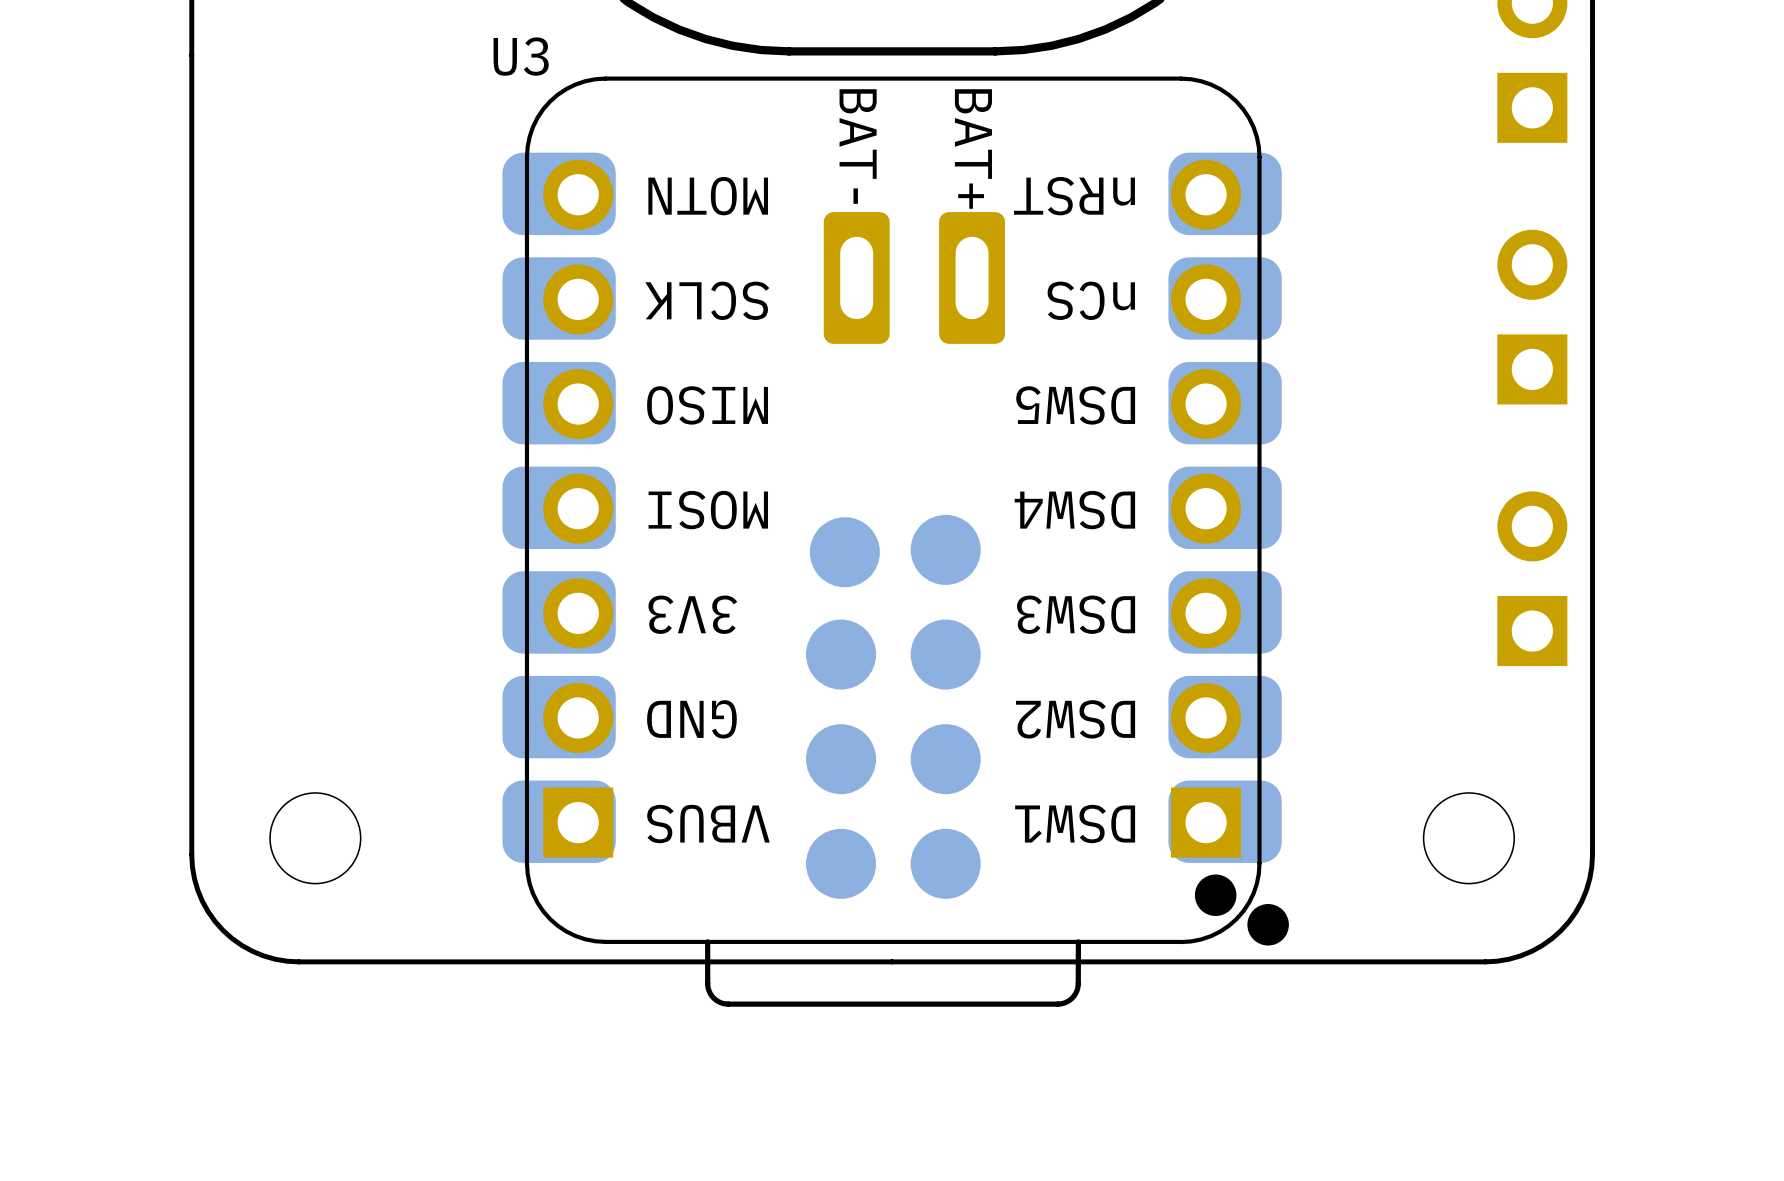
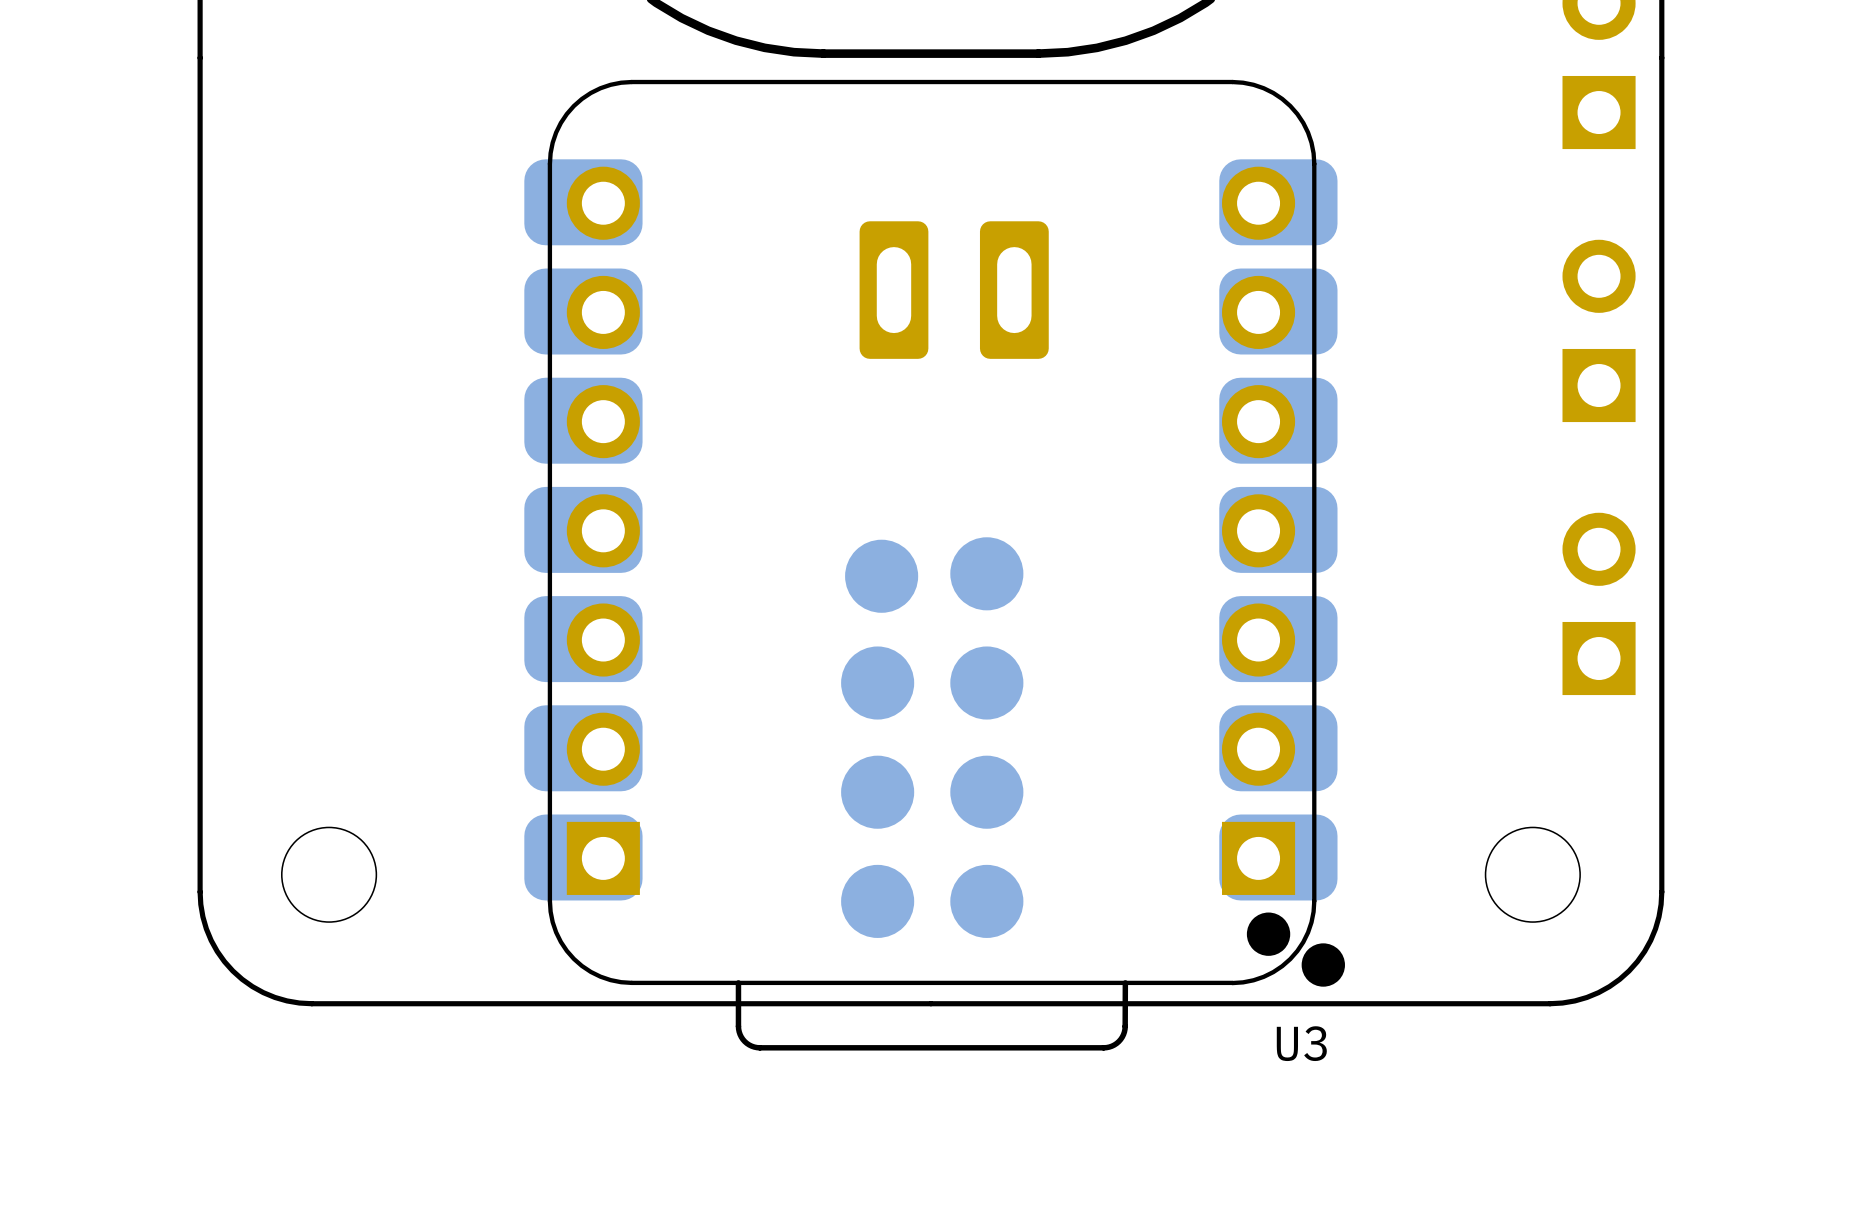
U3 name position: U3 (521, 56) -> U3 (1301, 1043)
text: BAT- (858, 146) -> none
text: BAT+ (973, 149) -> none
text: MOTN (708, 196) -> none
text: nRST (1074, 196) -> none
text: SCLK (707, 300) -> none
text: nCS (1091, 300) -> none
text: MISO (707, 405) -> none
text: DSW5 (1075, 405) -> none
text: MOSI (708, 510) -> none
text: DSW4 (1074, 510) -> none
text: 3V3 (692, 614) -> none
text: DSW3 (1076, 614) -> none
text: GND (691, 719) -> none
text: DSW2 (1075, 719) -> none
text: VBUS (708, 824) -> none
text: DSW1 (1075, 824) -> none

